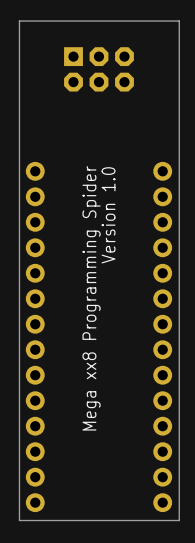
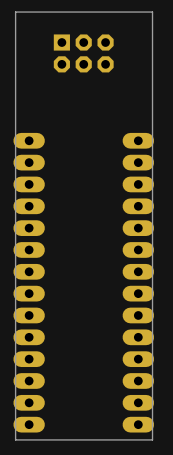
part footprint: [25, 161, 45, 513] -> [13, 132, 45, 433]
part footprint: [153, 161, 173, 513] -> [122, 132, 155, 433]
text: Version 1.0 (108, 215) -> none
text: Mega xx8 Programming Spider (91, 298) -> none

